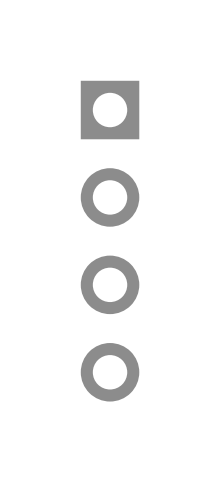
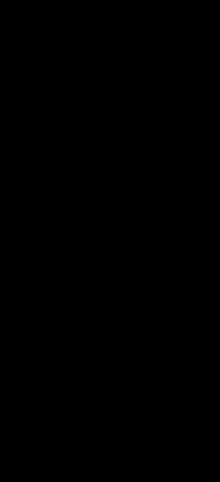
part: (110, 241) -> none

